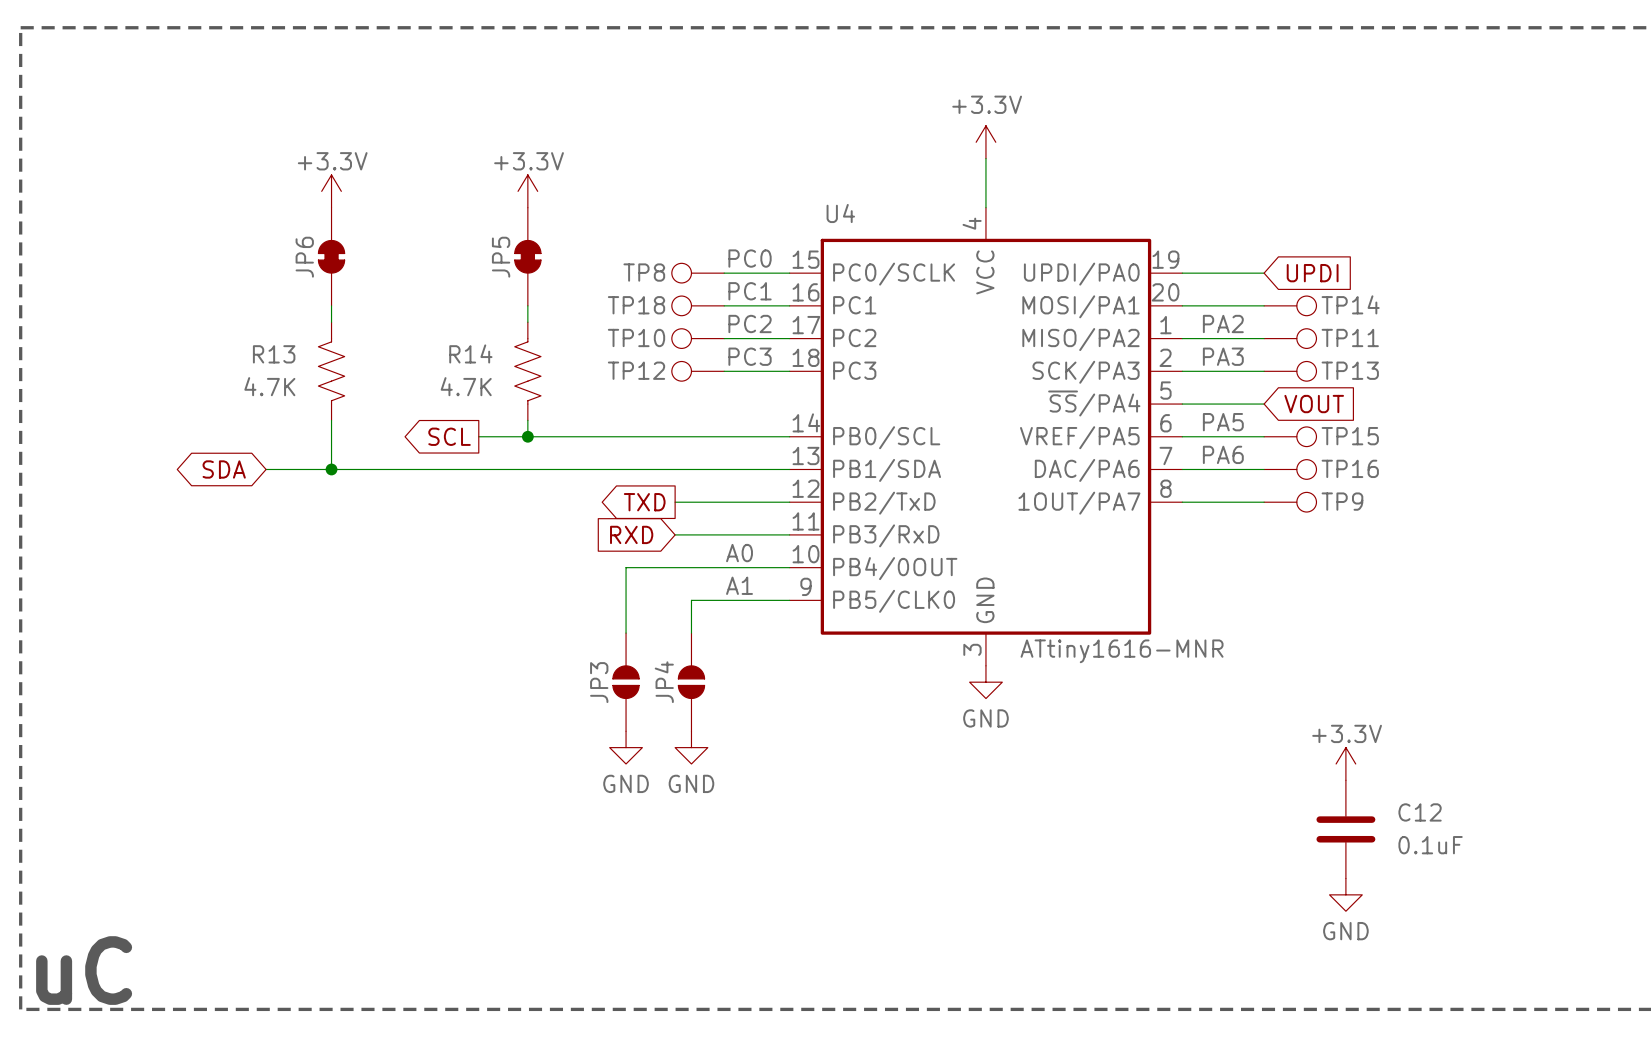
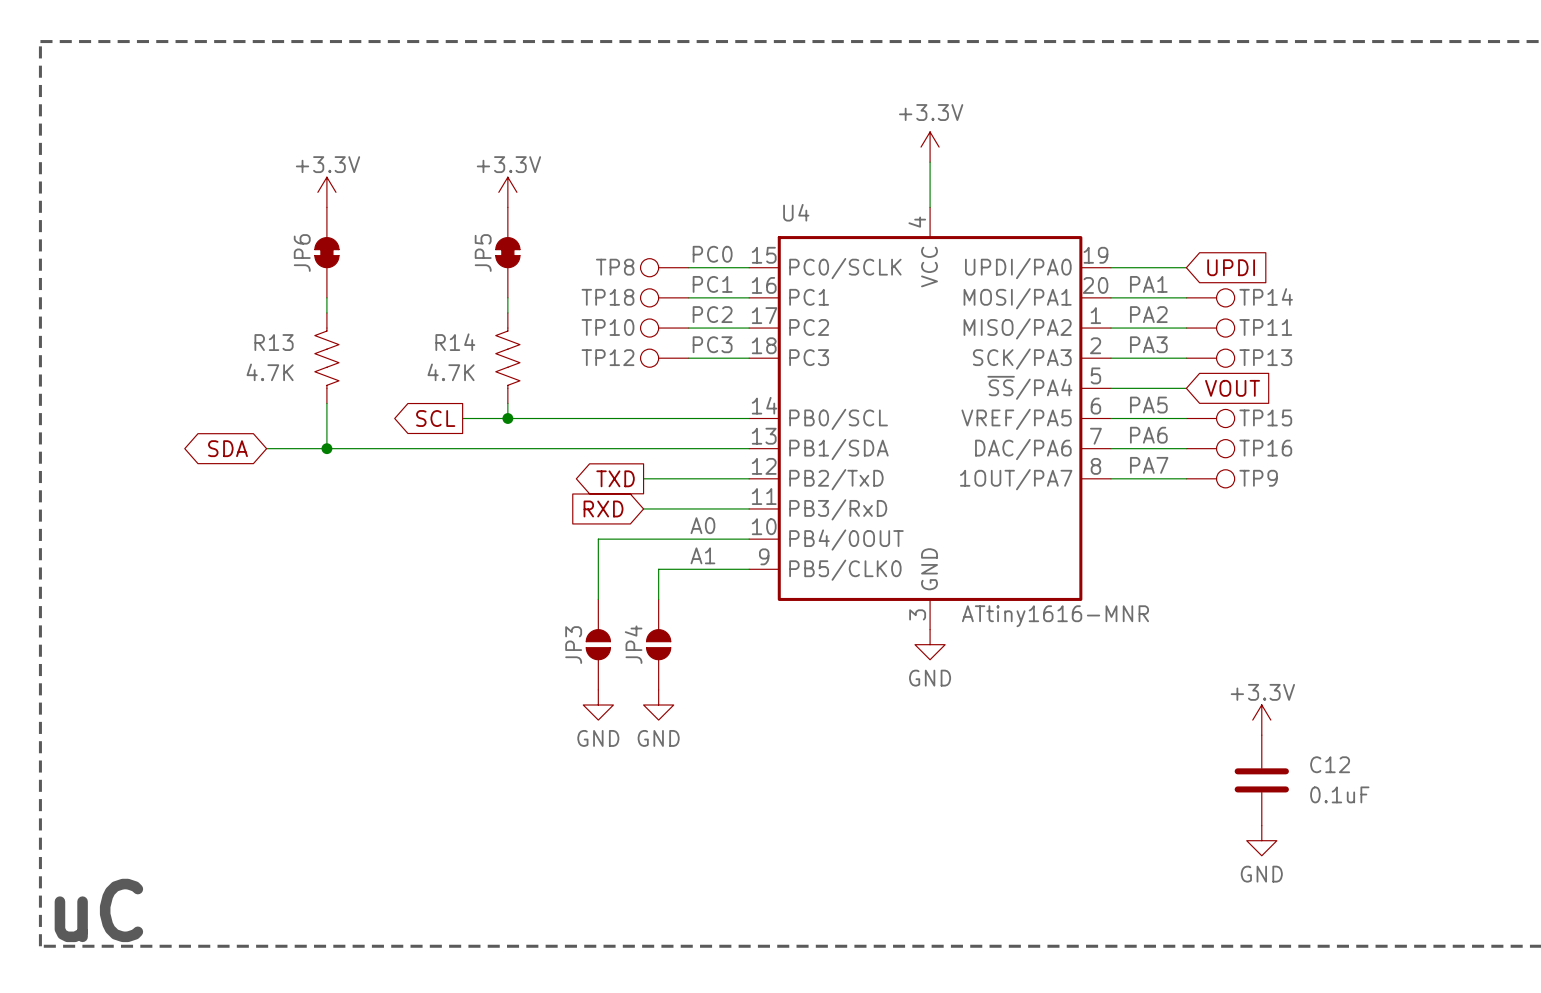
label: none -> PA1 (1148, 284)
label: none -> PA7 (1149, 465)

